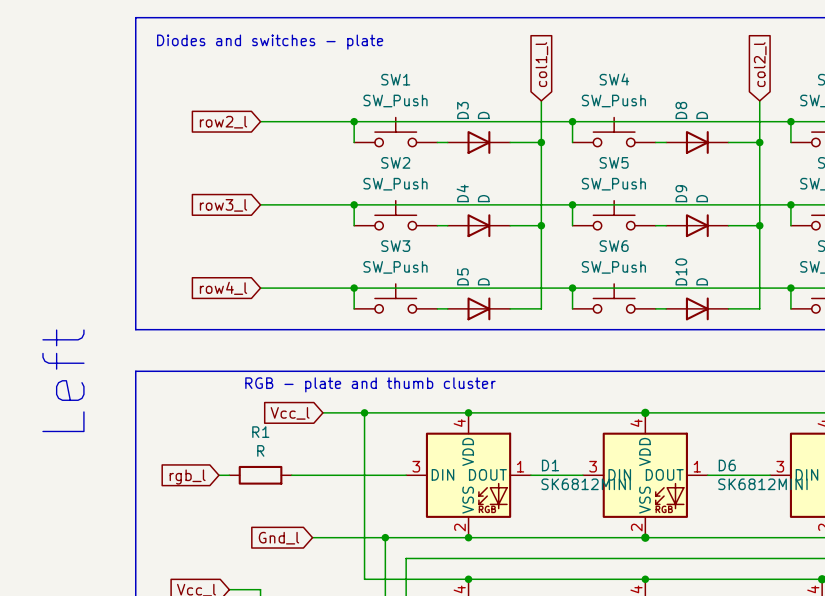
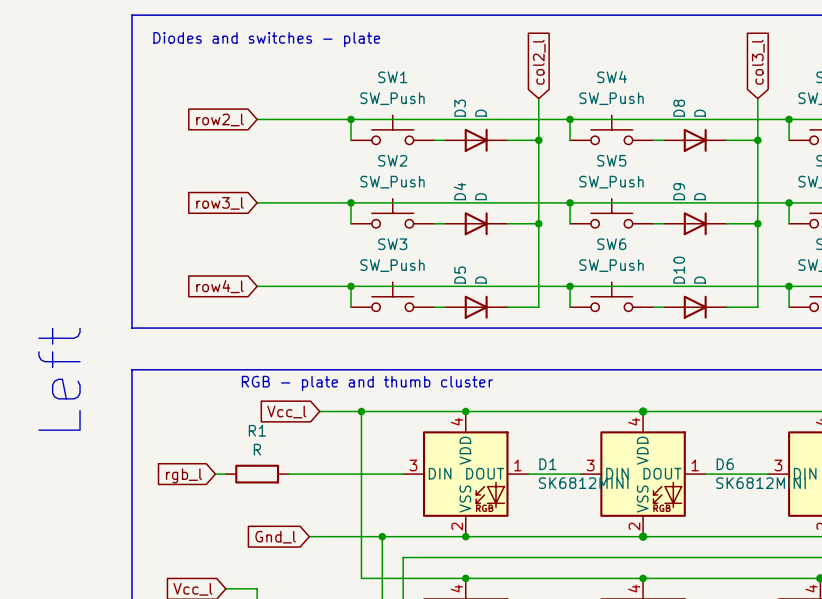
global label: col1_l (541, 64) -> col2_l (539, 62)
global label: col2_l (760, 64) -> col3_l (758, 62)

